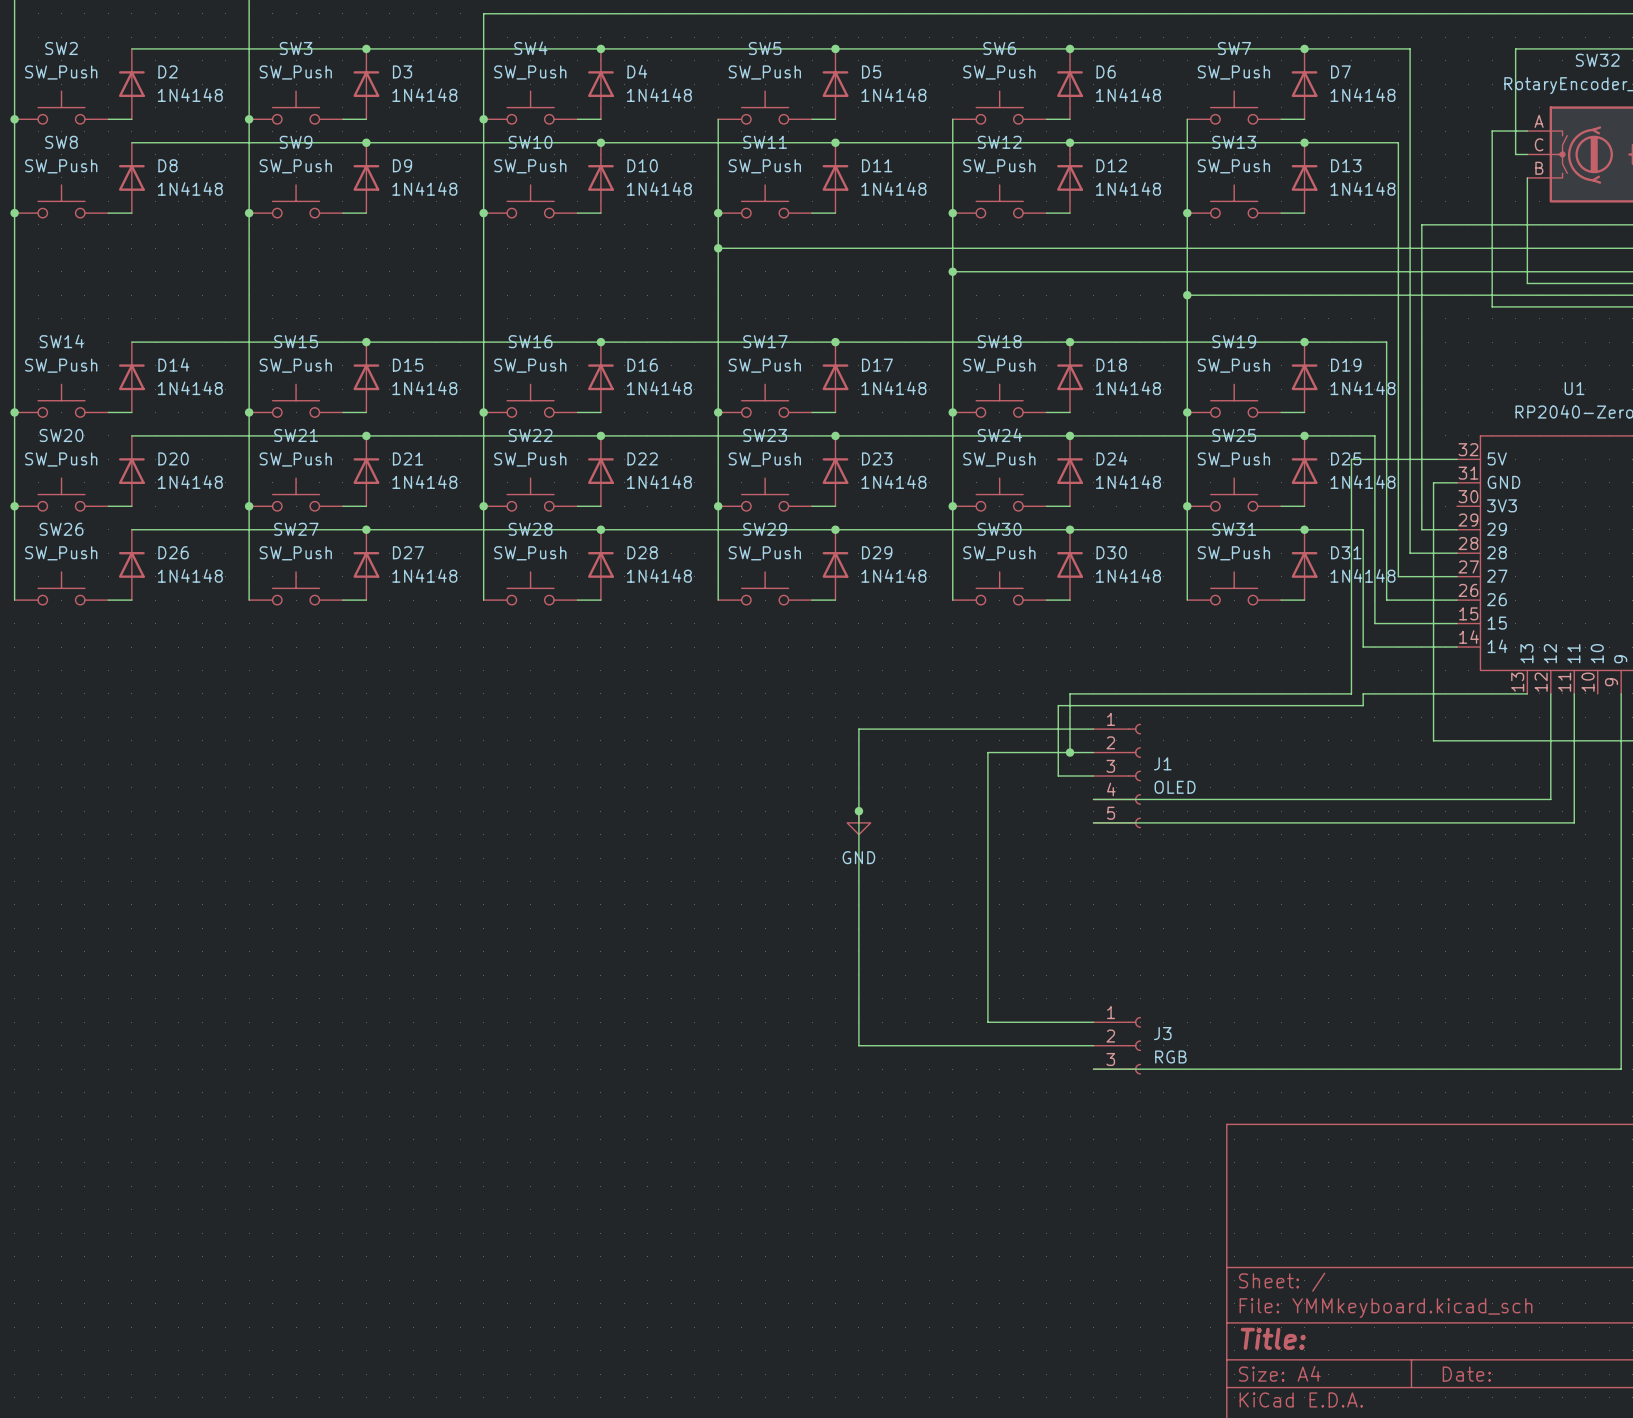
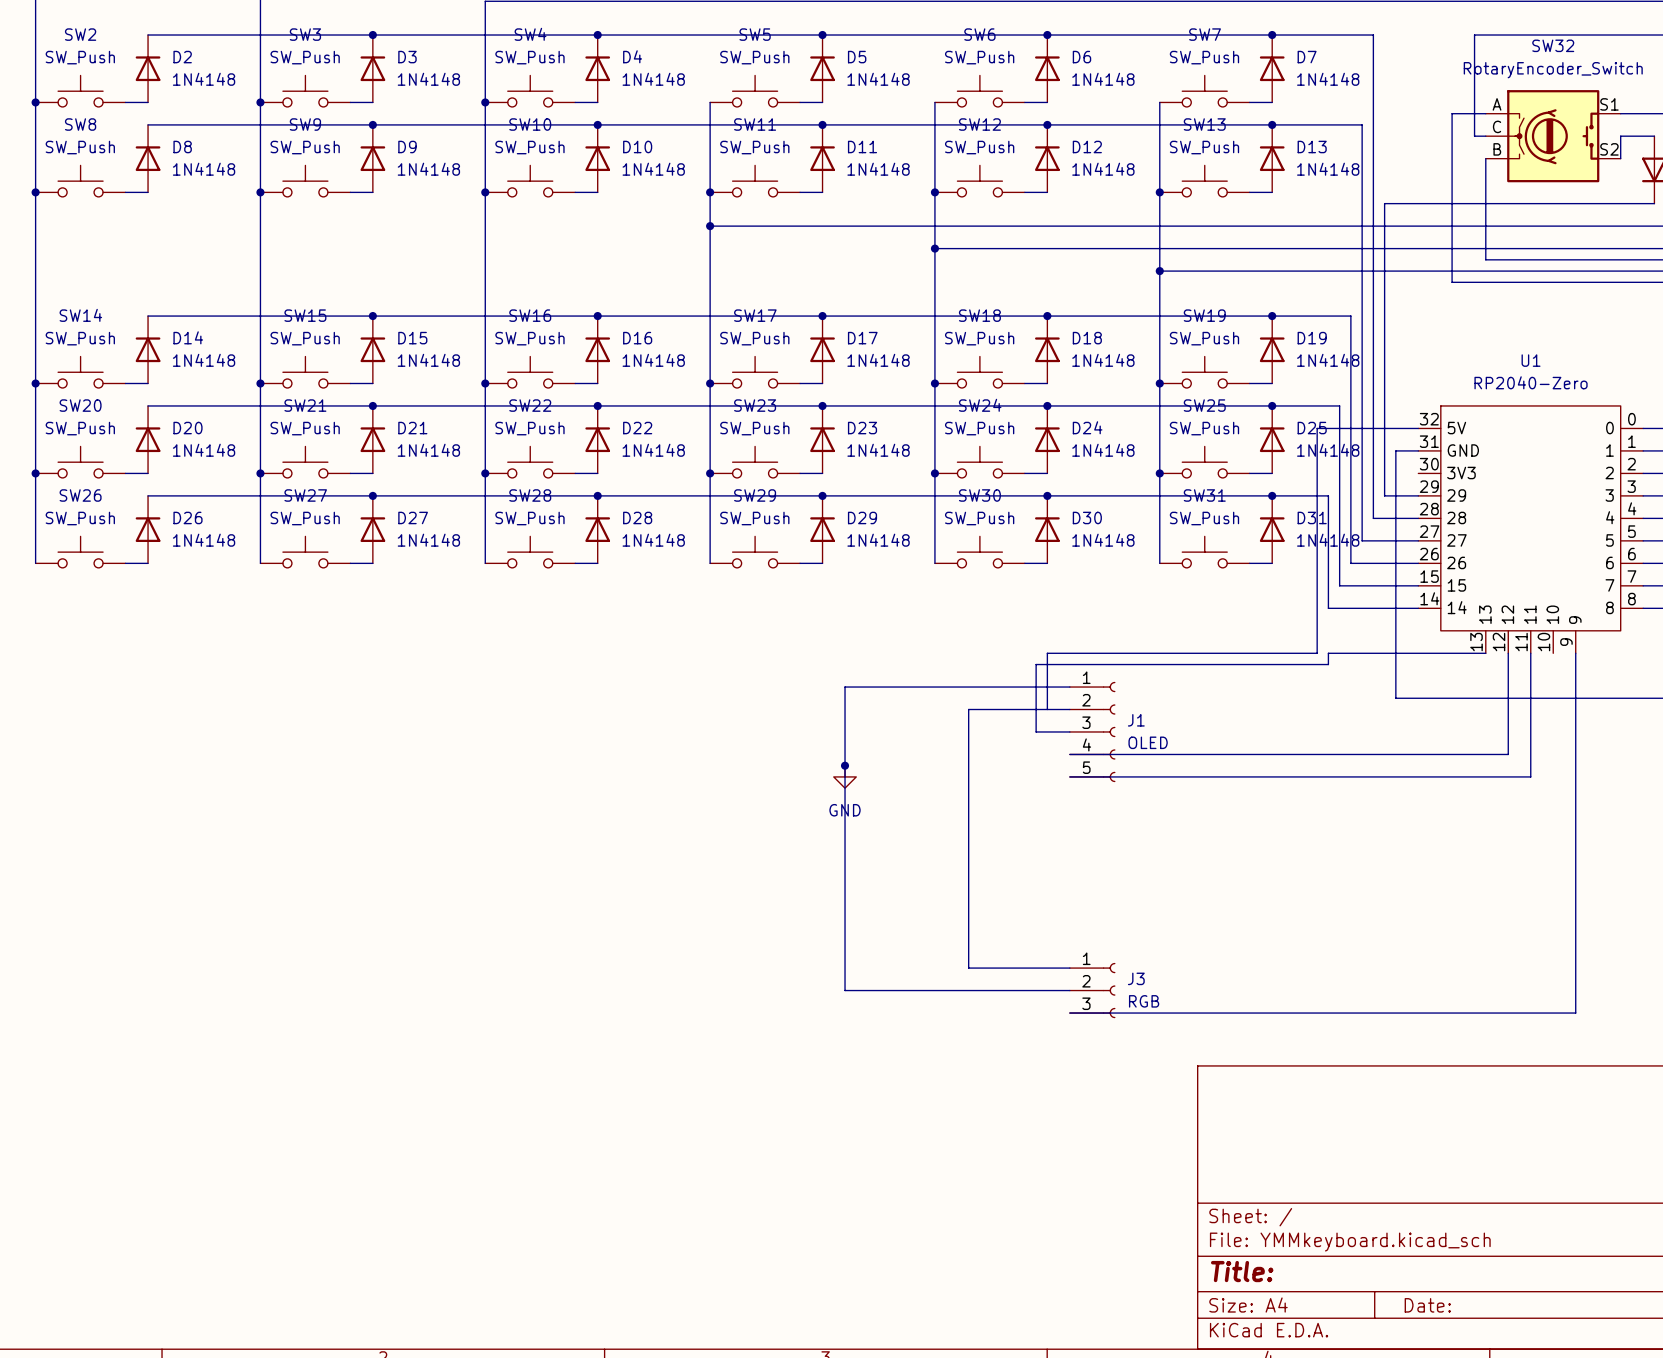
junction: (1070, 752) -> none

